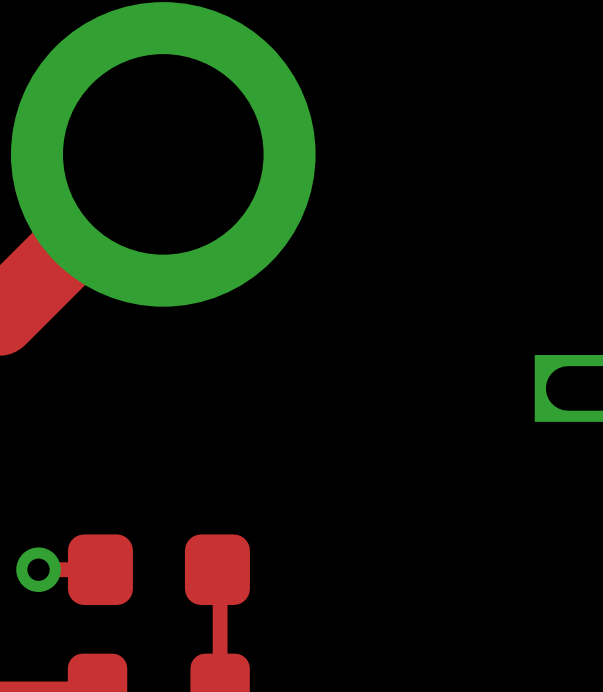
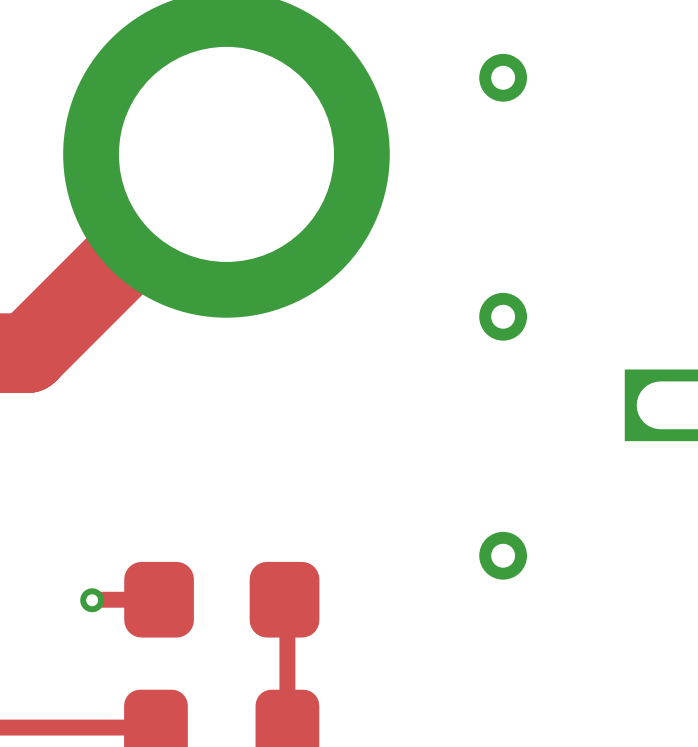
via: none -> (503, 77)
via: none -> (503, 316)
via: none -> (503, 555)
via size: [16, 547, 61, 592] -> [80, 588, 105, 613]

